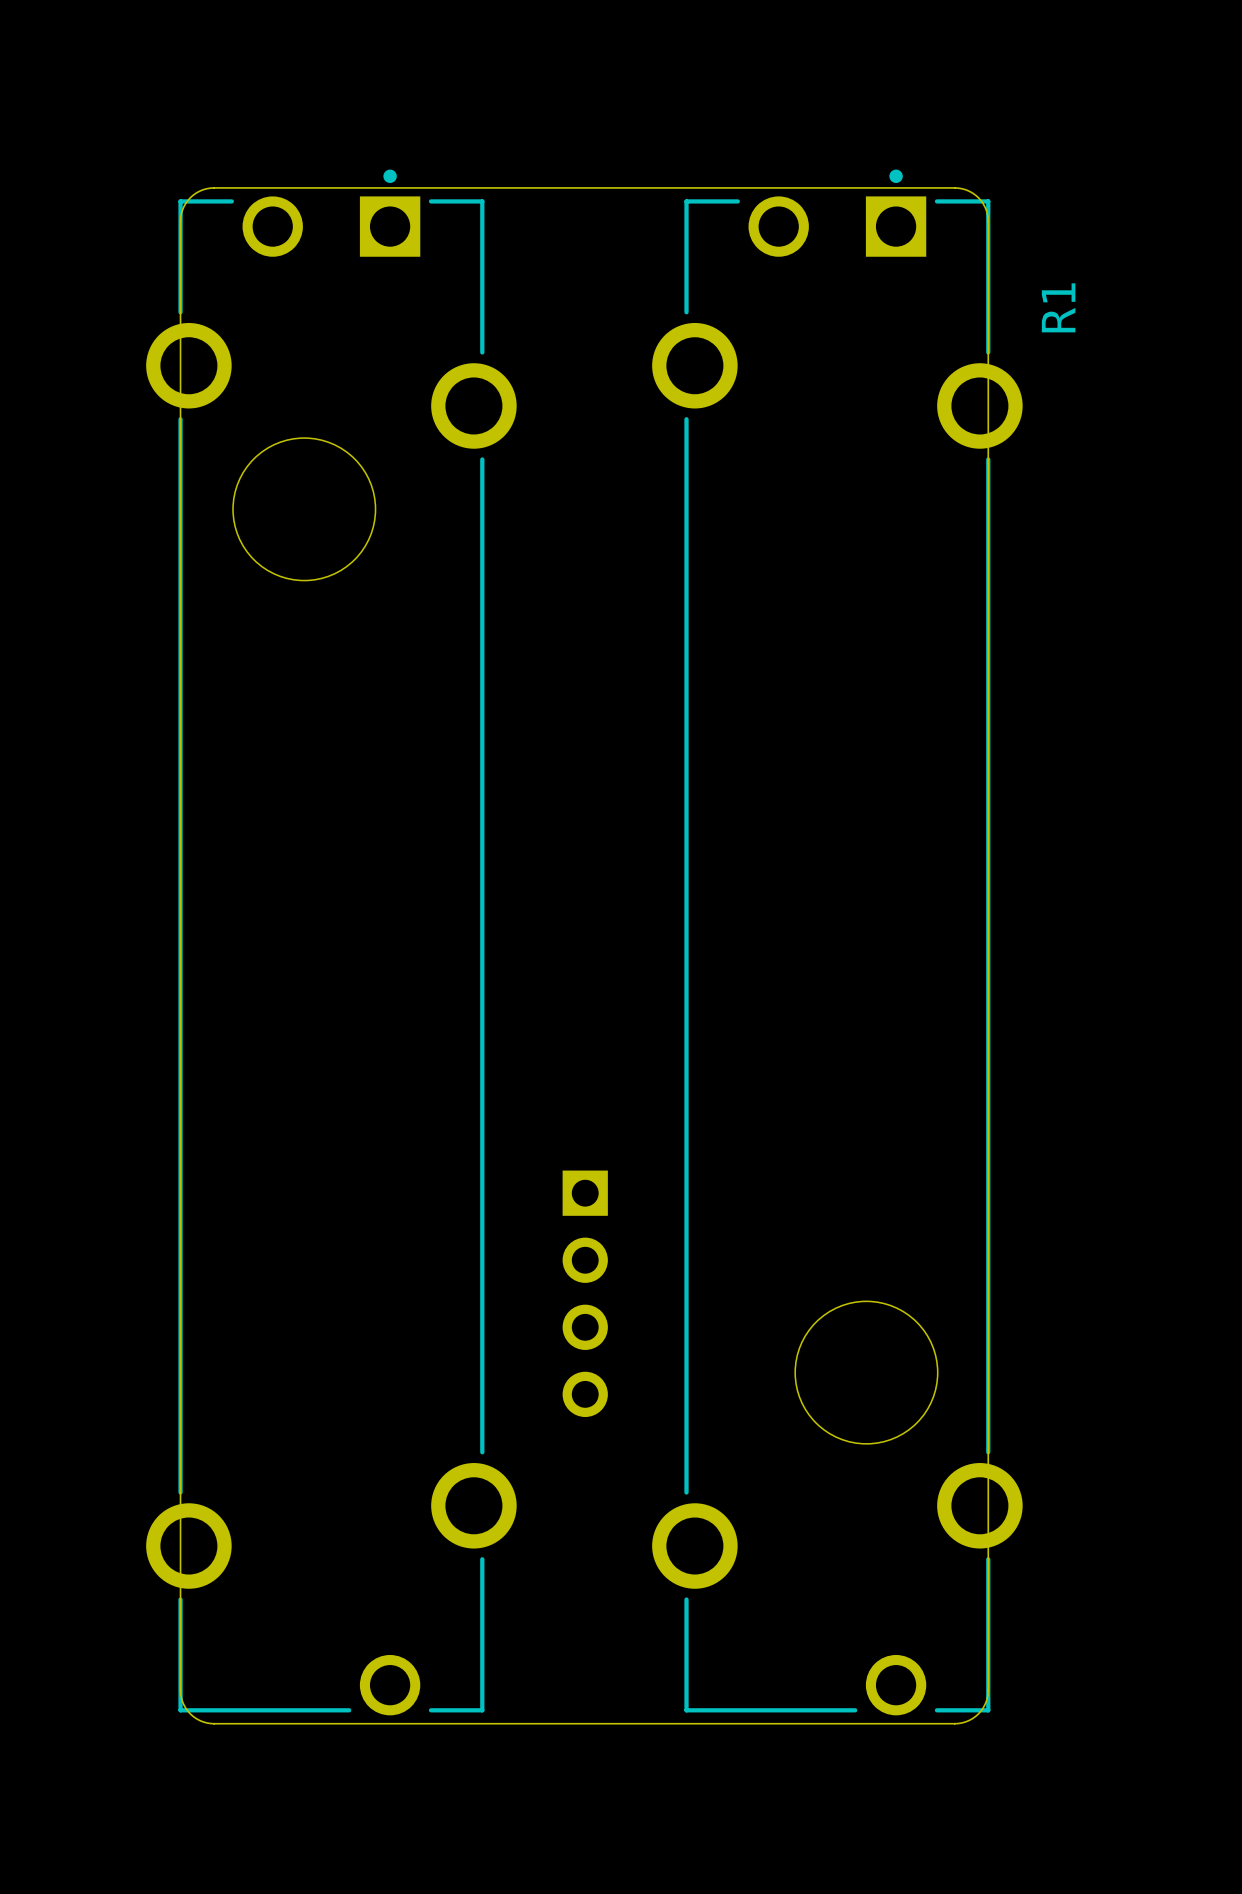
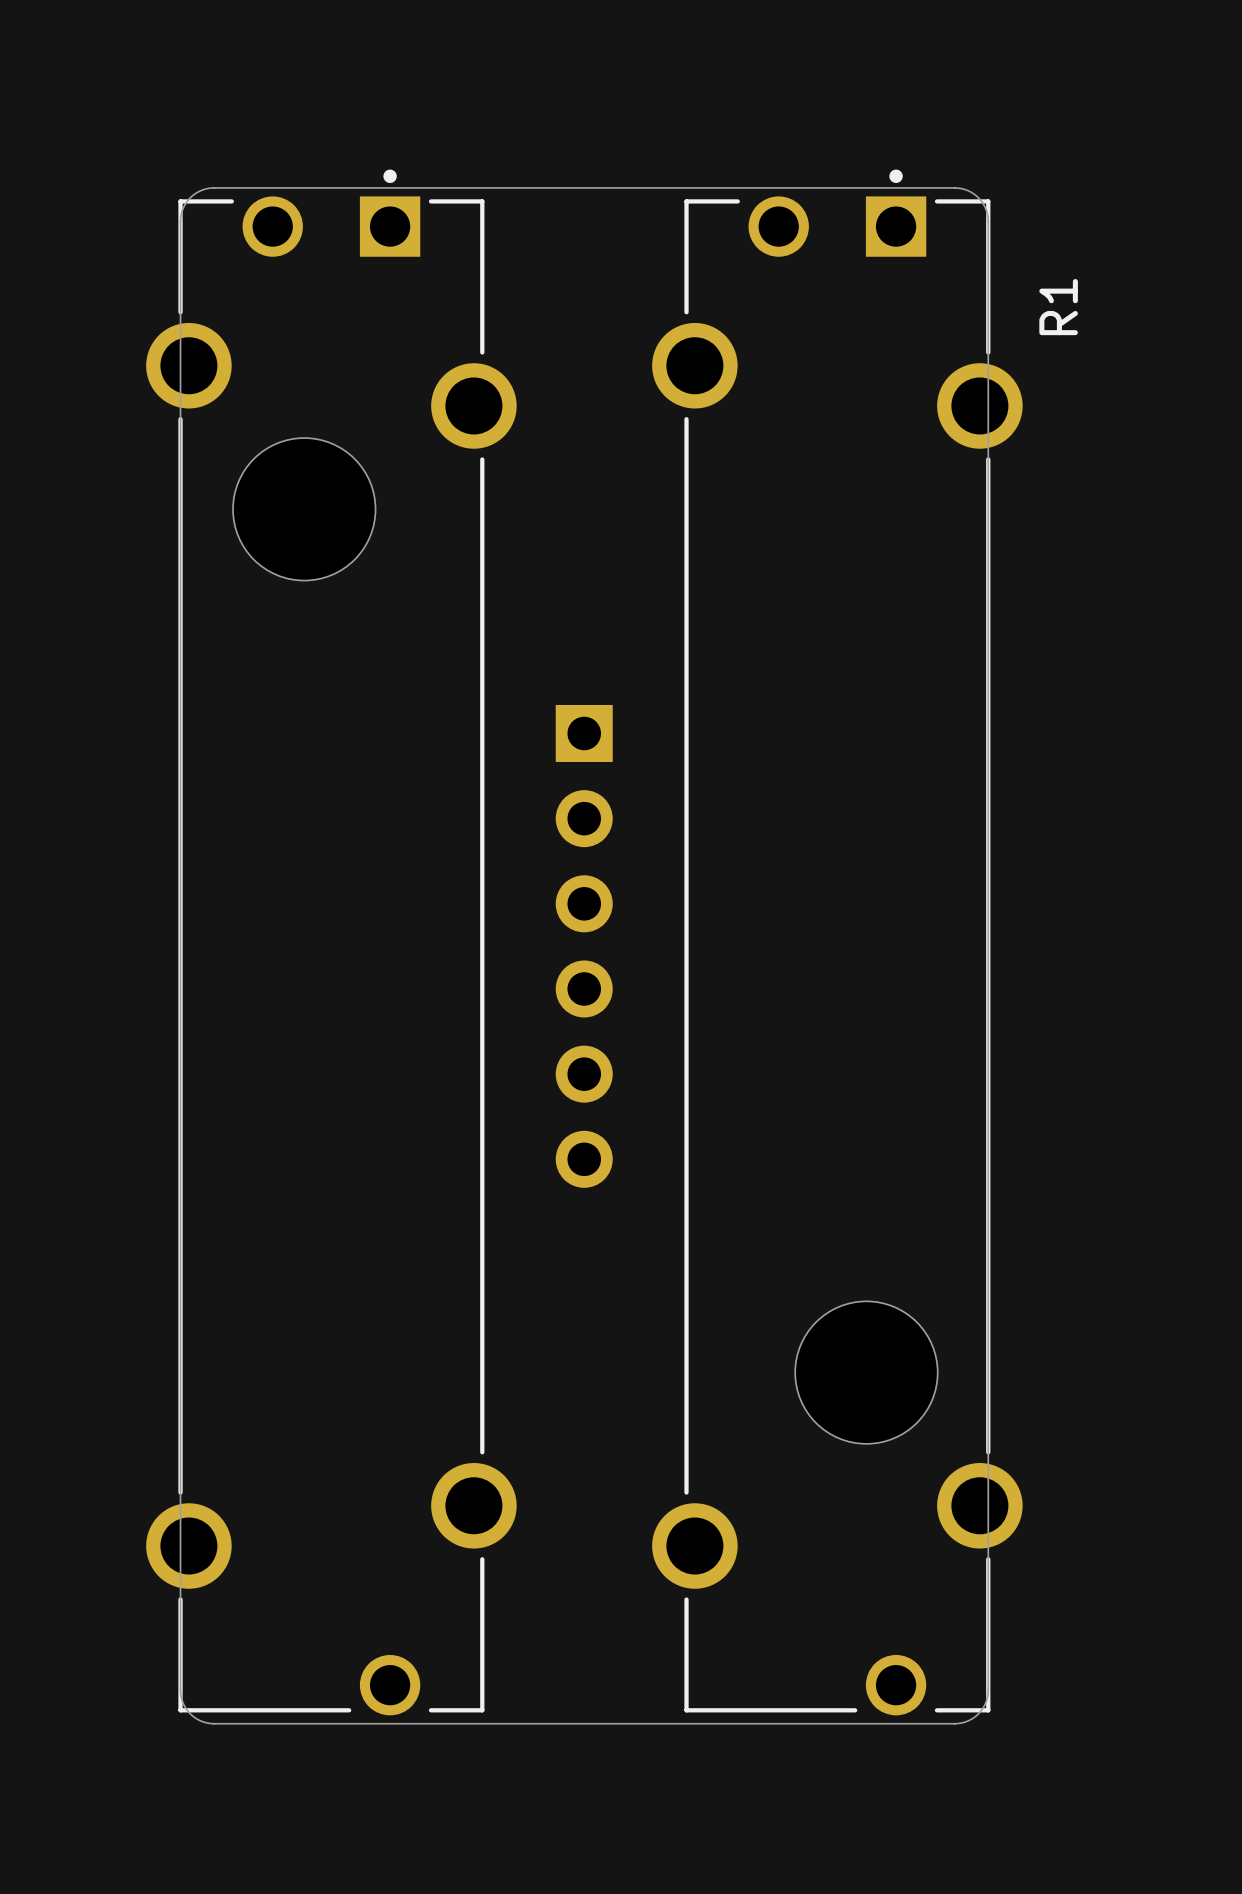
part: none -> (584, 946)
part: (585, 1293) -> none

